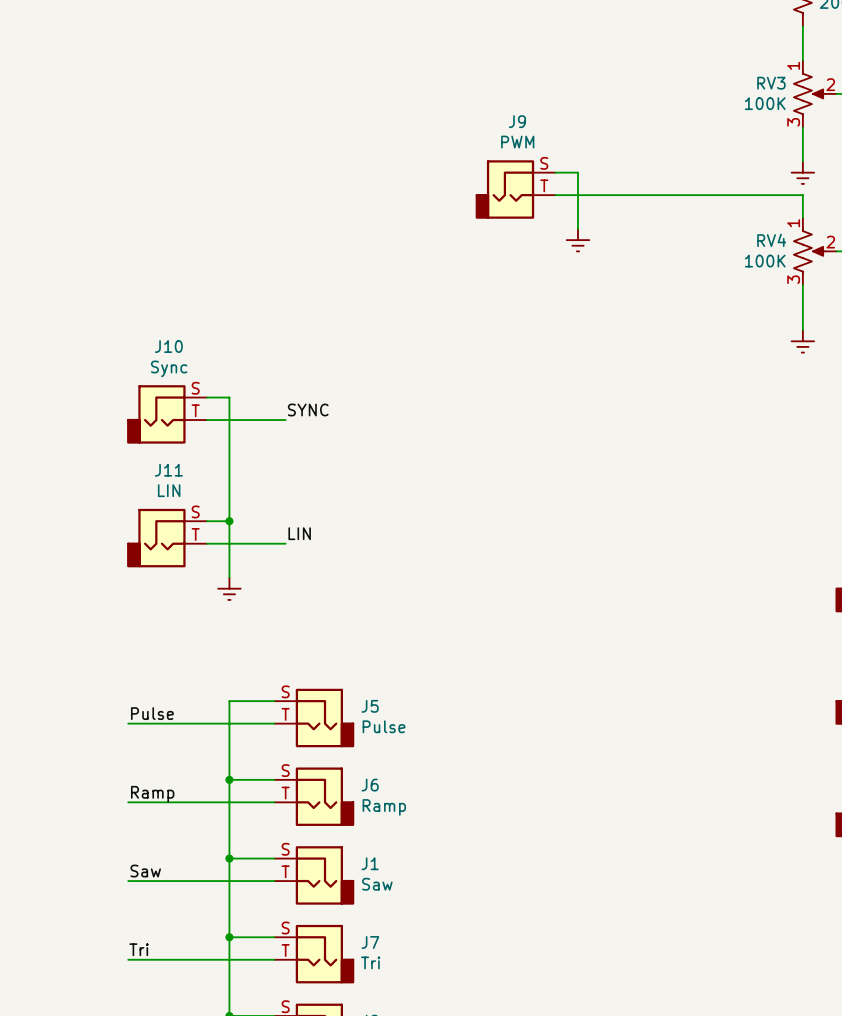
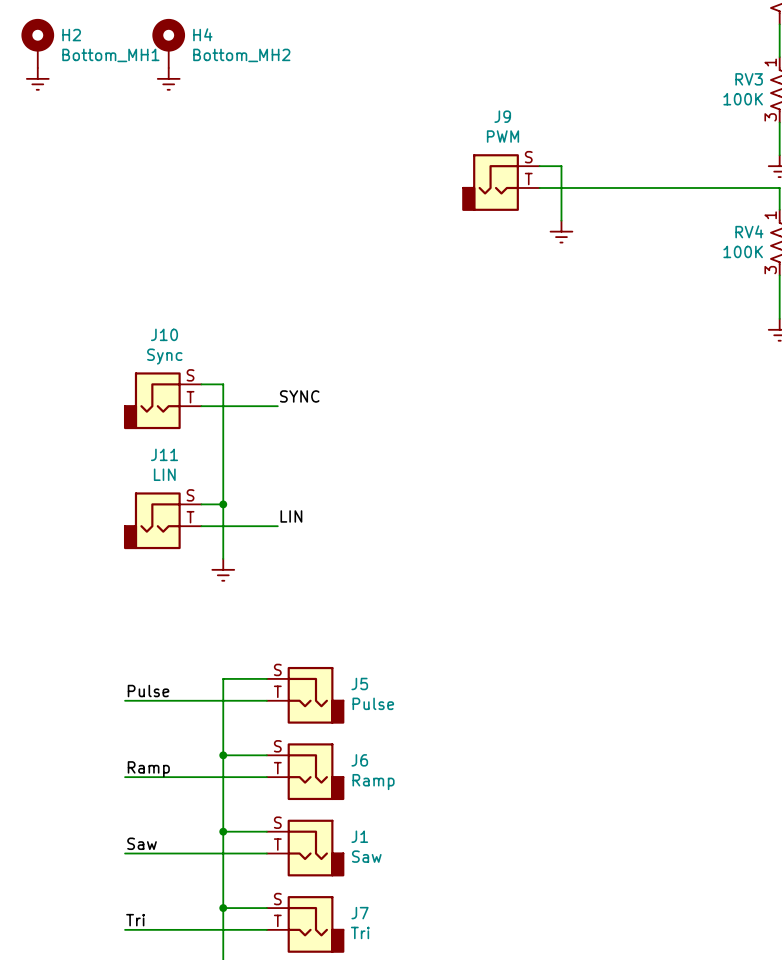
H2: none -> Bottom_MH1 (37, 43)
H4: none -> Bottom_MH2 (168, 43)
power symbol: none -> (37, 78)
power symbol: none -> (168, 78)

